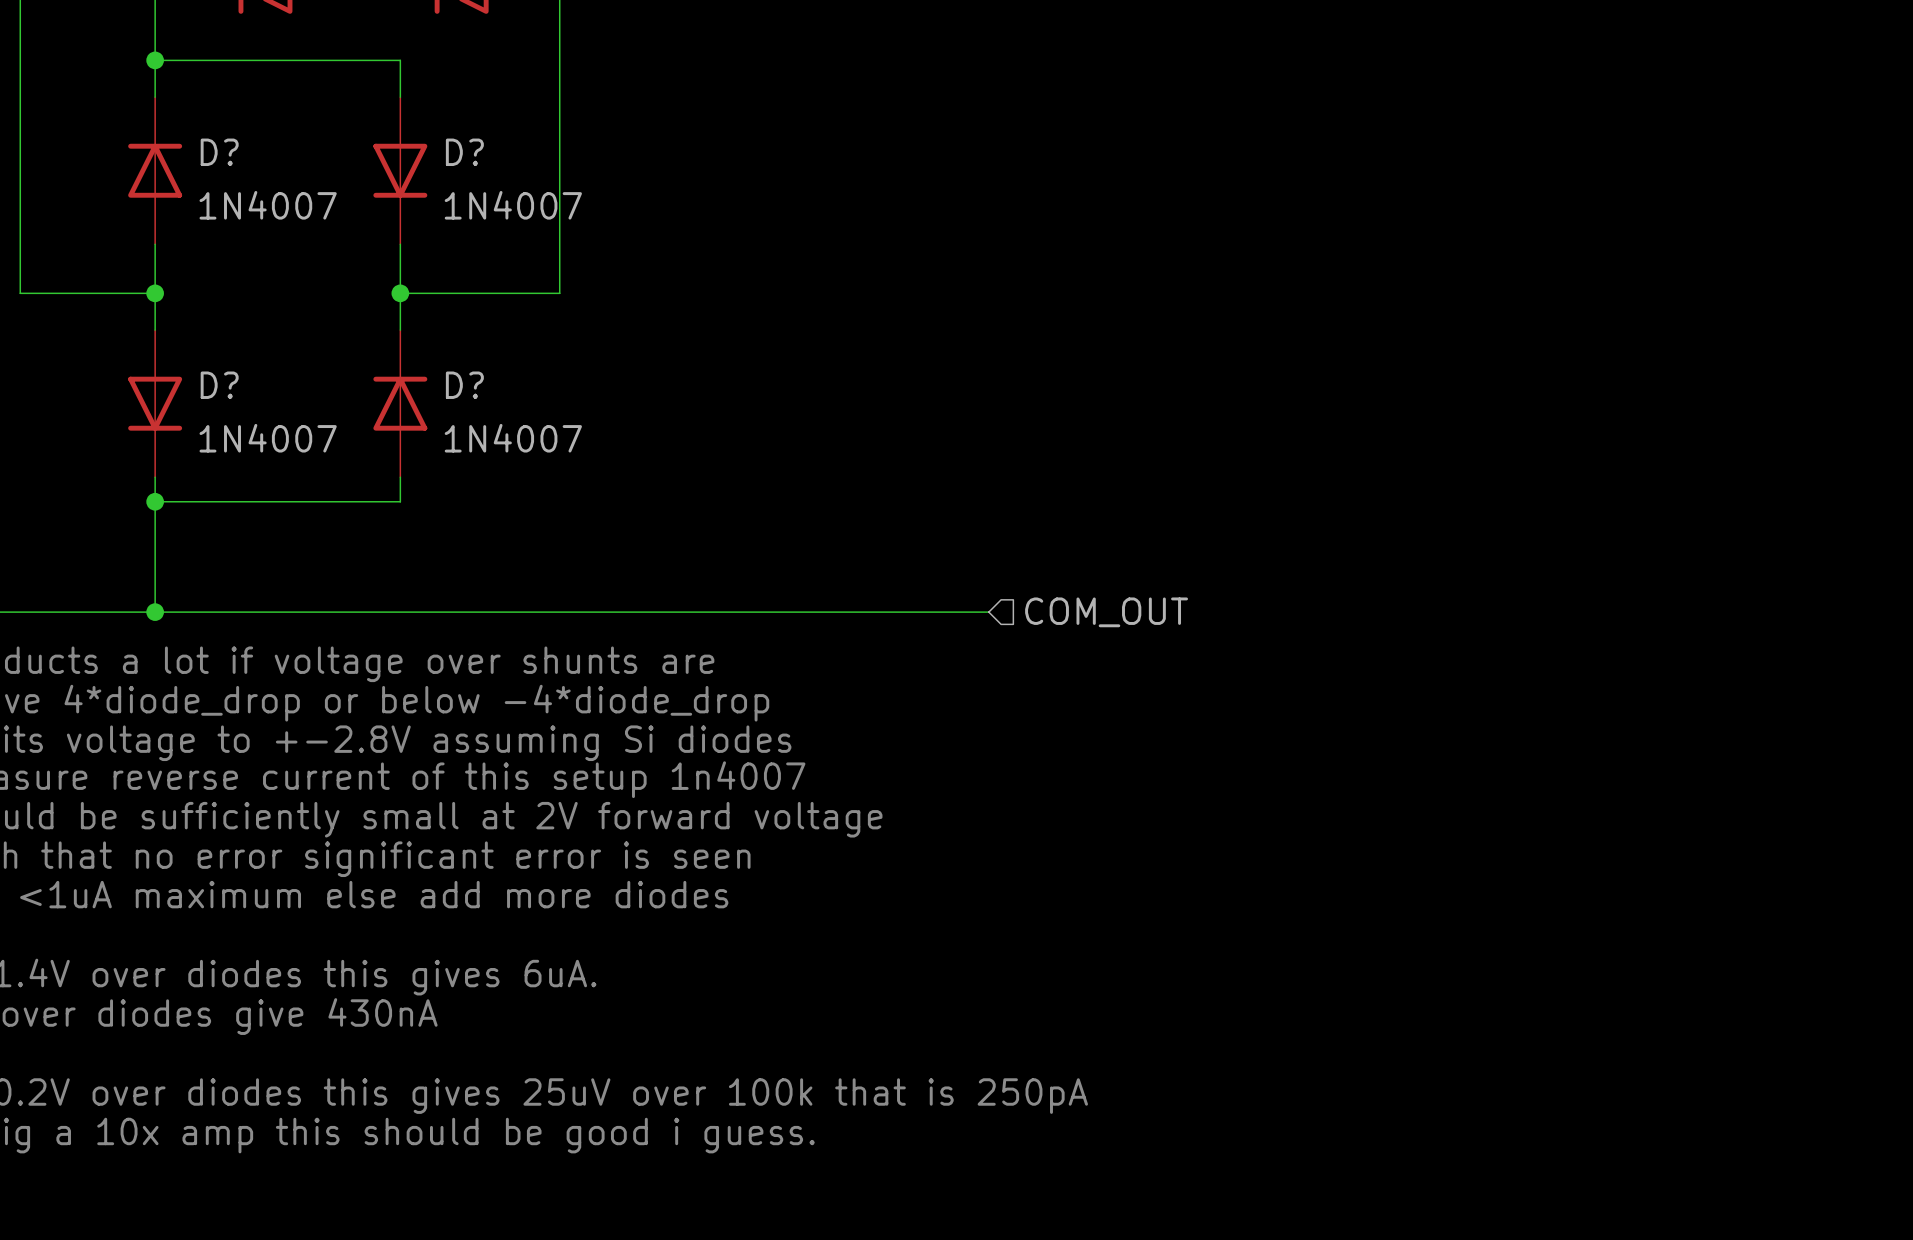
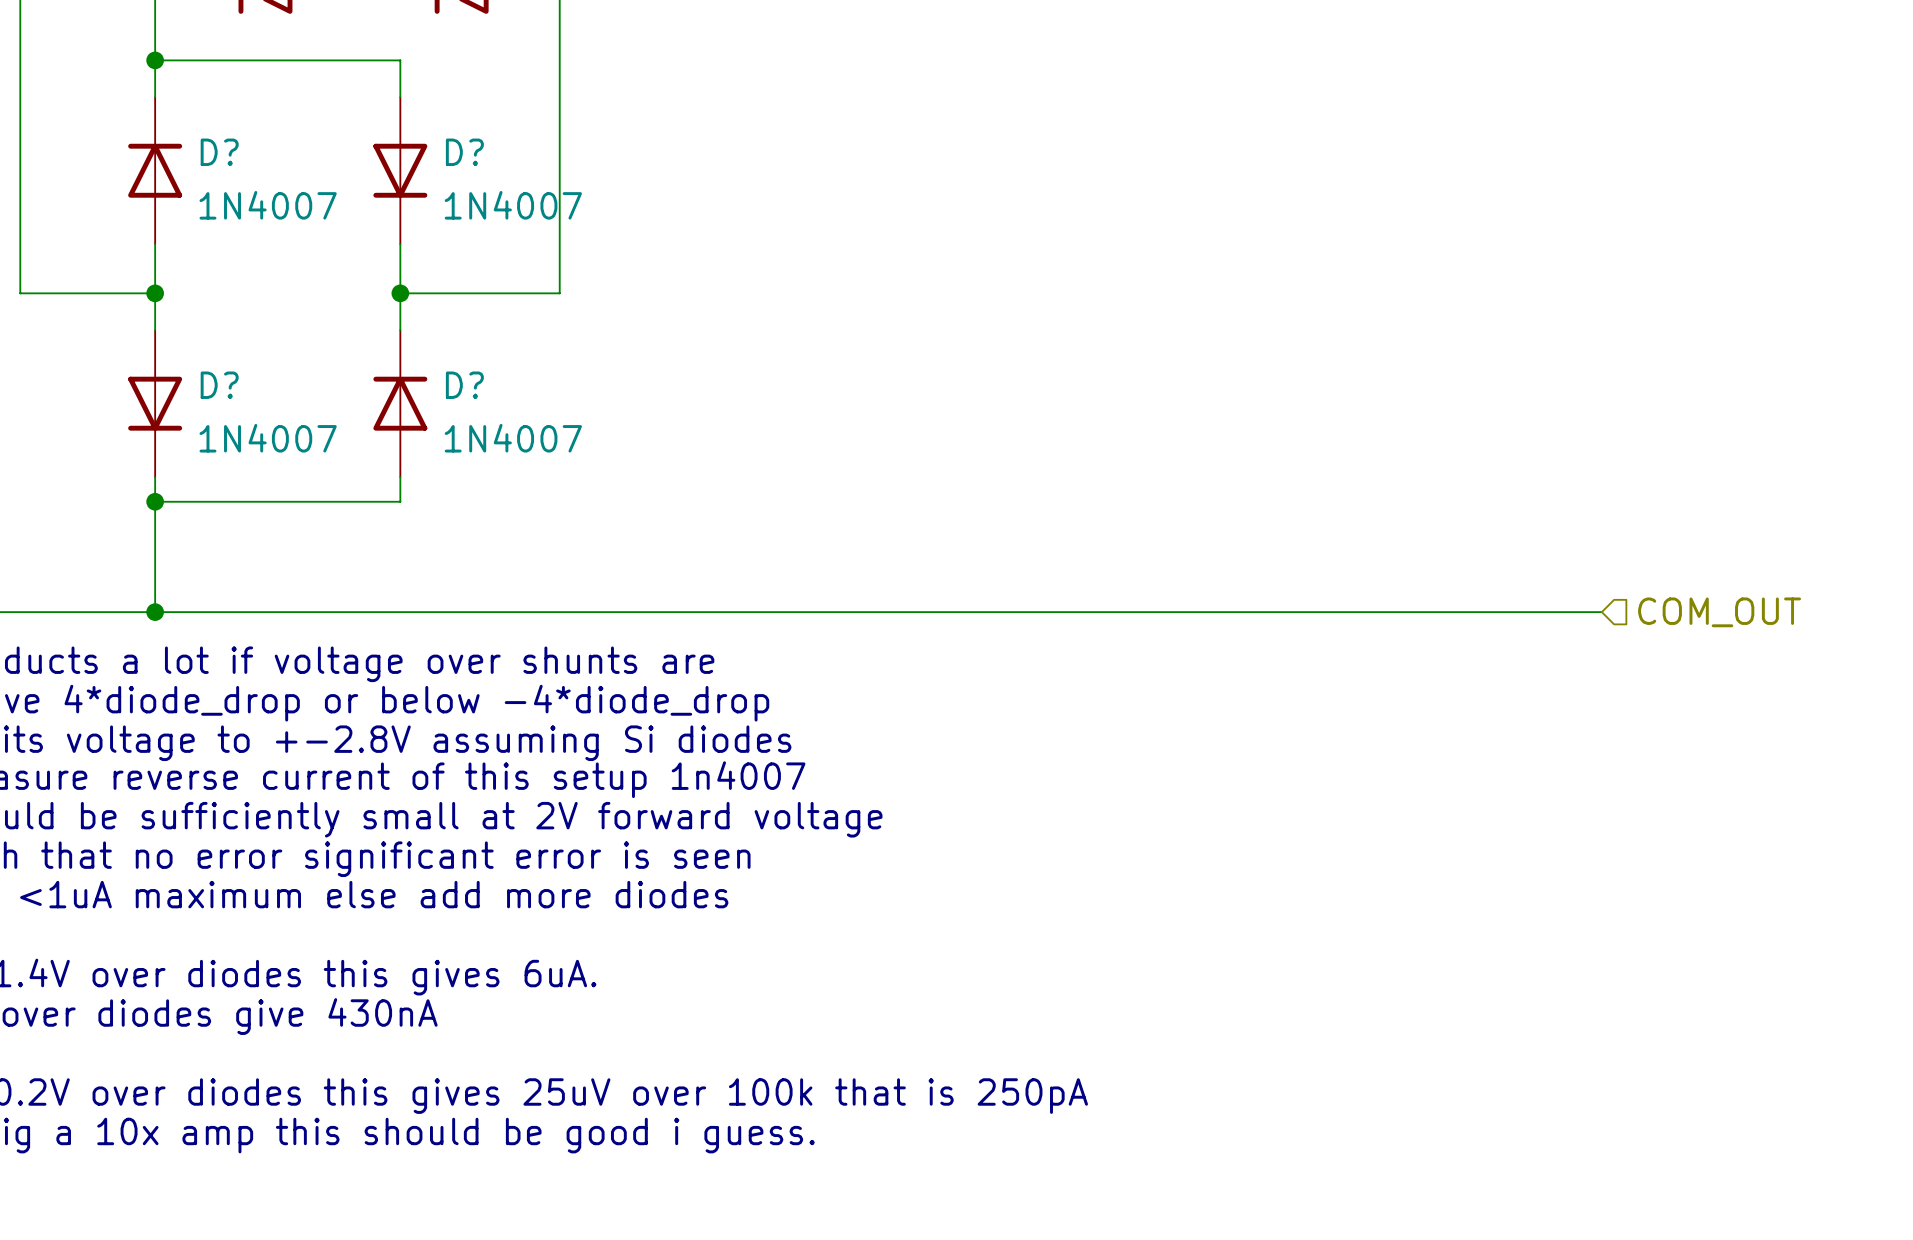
wire: none -> (988, 612) (1601, 612)
hierarchical label: COM_OUT (1106, 612) -> none
hierarchical label: none -> COM_OUT (1719, 612)

